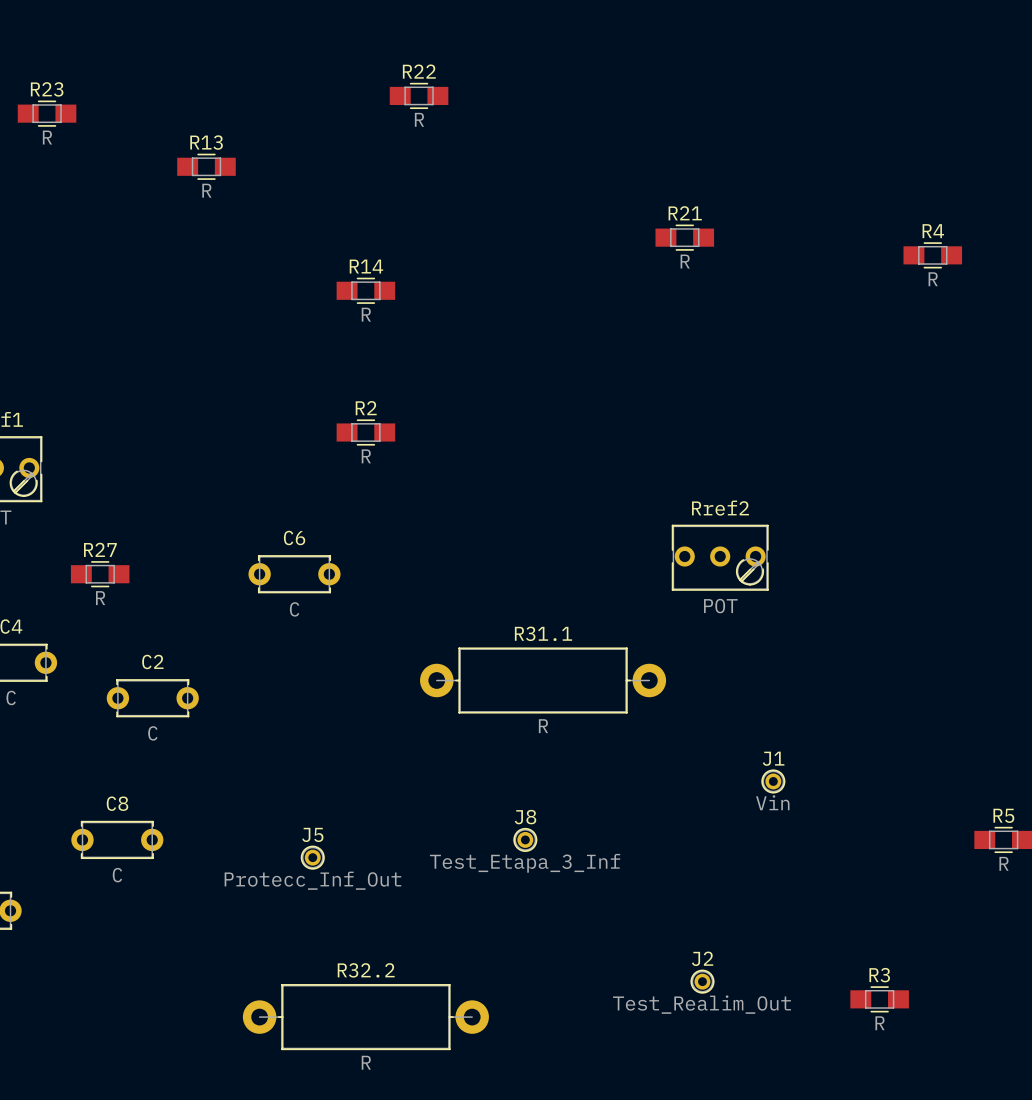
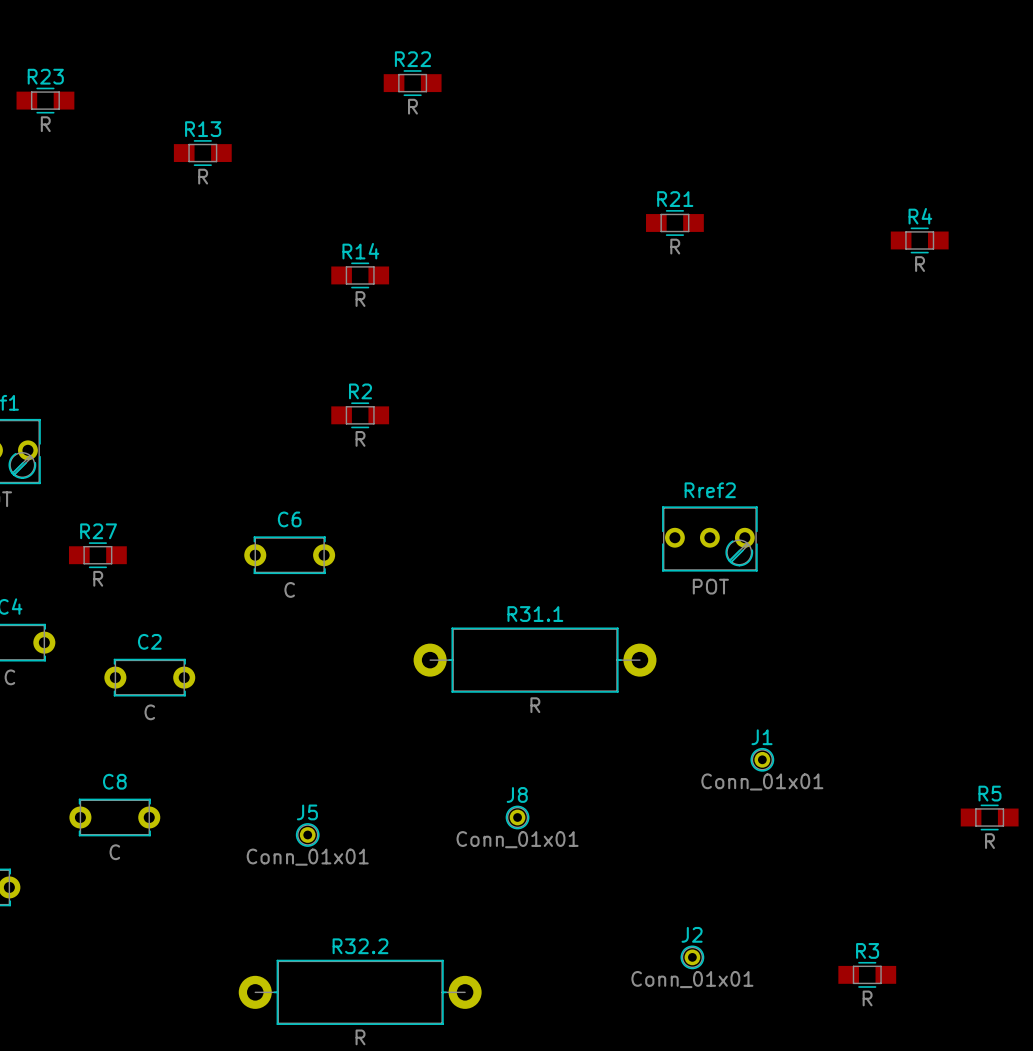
J1 value: Vin (772, 802) -> Conn_01x01 (762, 781)
J8 value: Test_Etapa_3_Inf (525, 863) -> Conn_01x01 (517, 839)
J5 value: Protecc_Inf_Out (312, 880) -> Conn_01x01 (307, 857)
J2 value: Test_Realim_Out (702, 1004) -> Conn_01x01 (692, 979)

